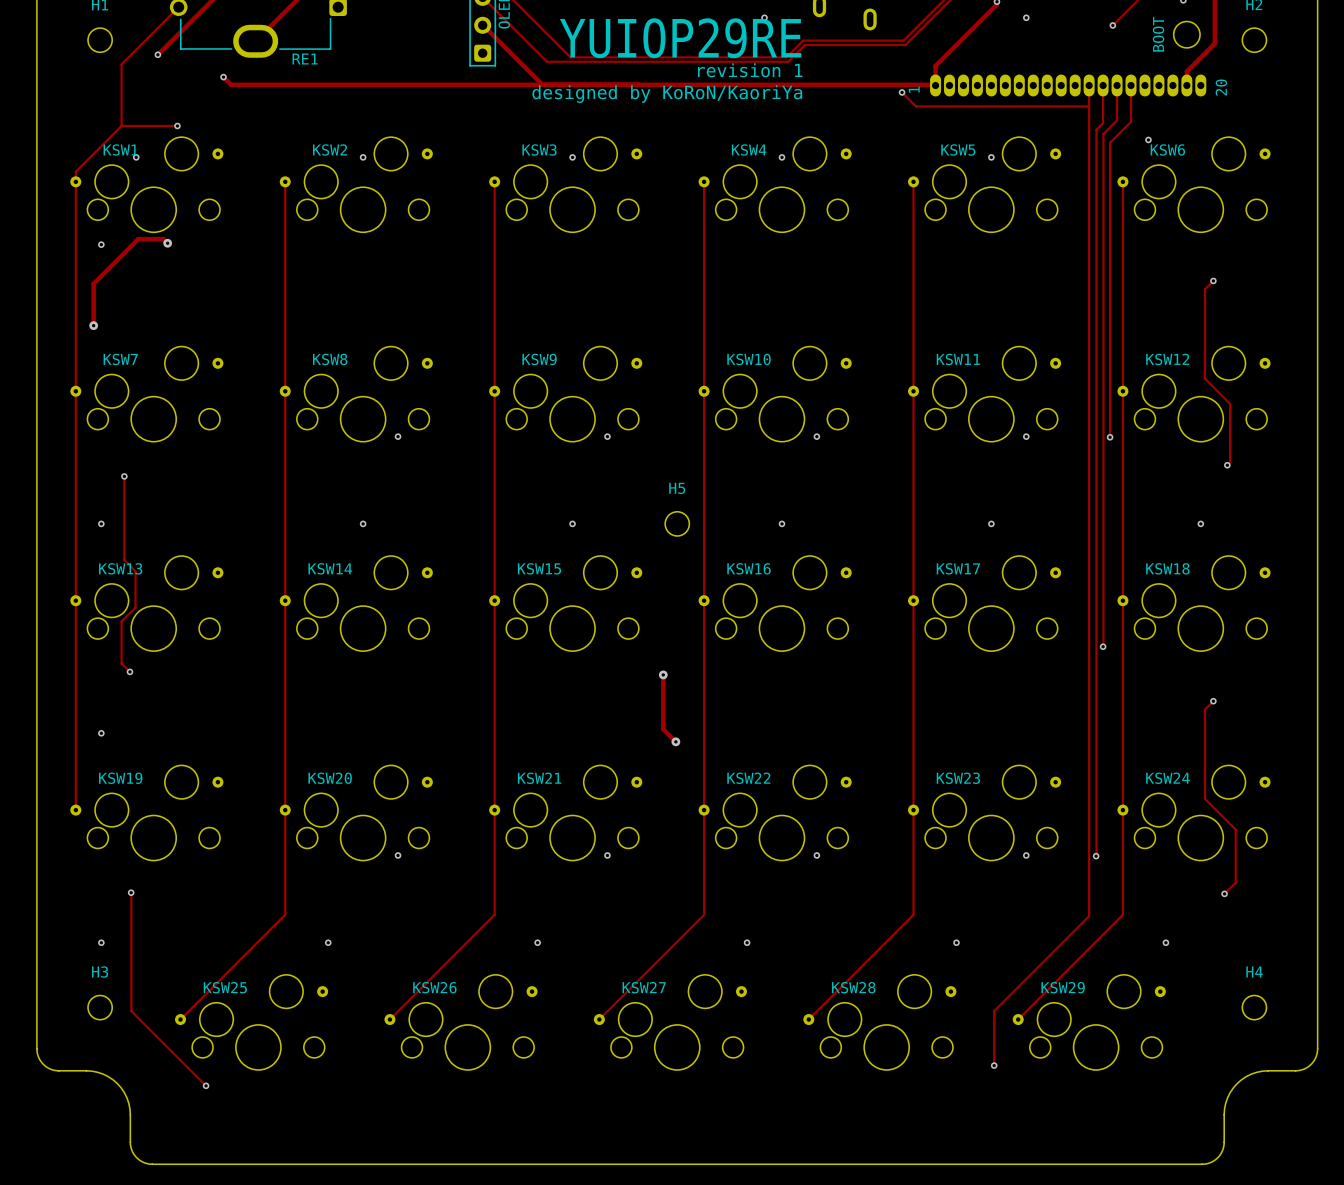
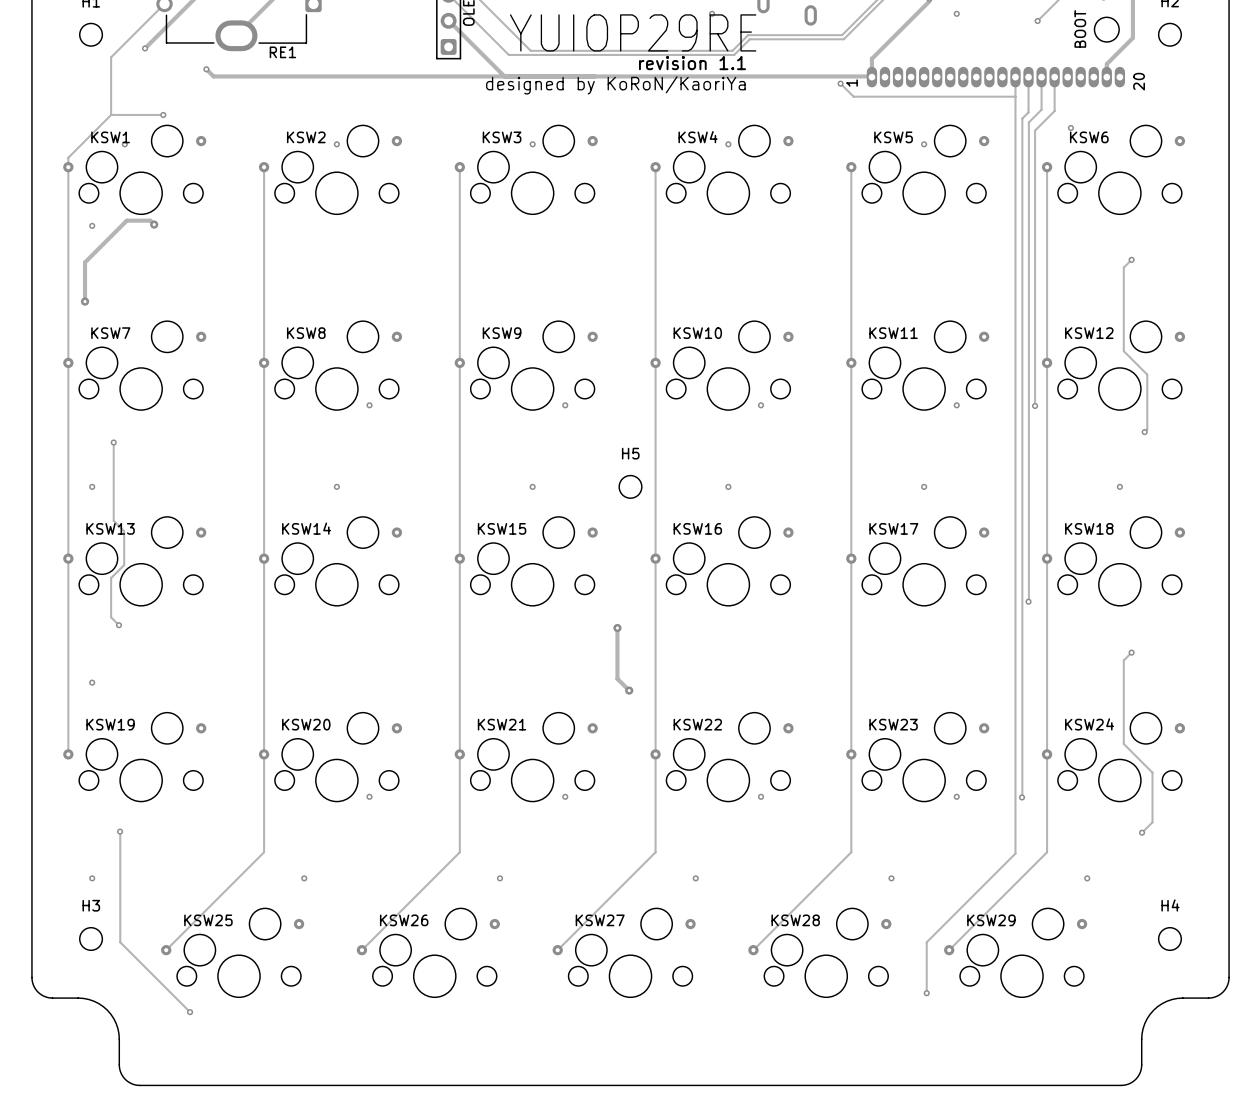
text: revision 1 (750, 70) -> revision 1.1 (692, 63)

